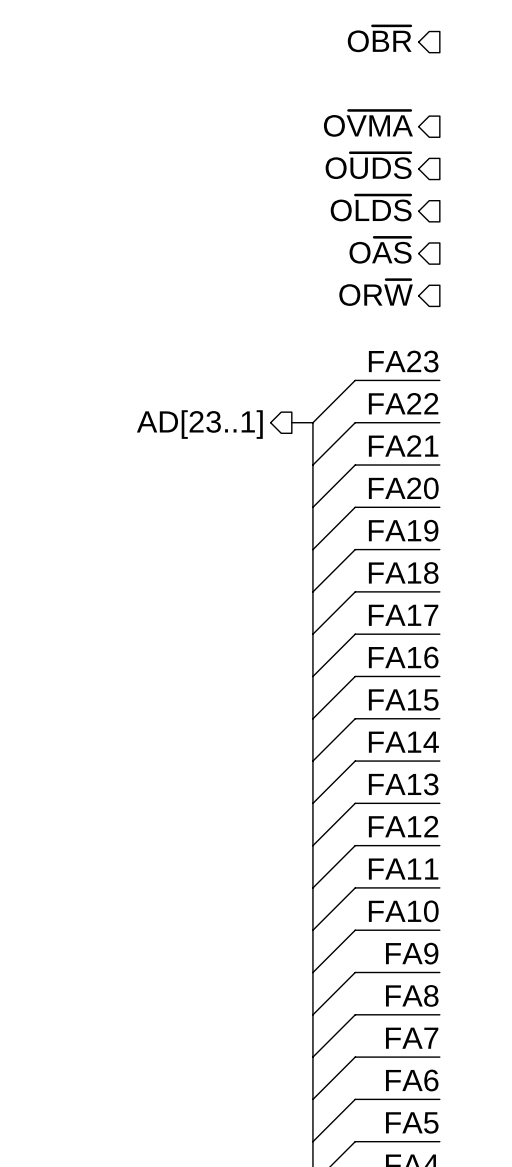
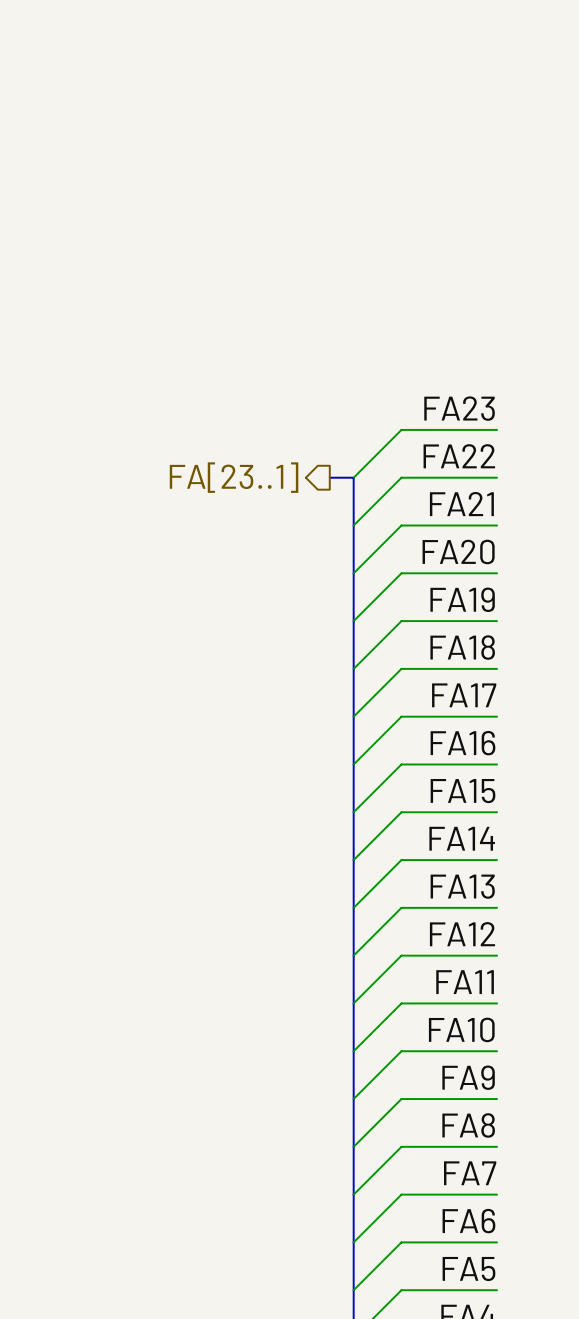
hierarchical label: O~{BR} (379, 39) -> none
hierarchical label: O~{VMA} (368, 123) -> none
hierarchical label: O~{UDS} (368, 165) -> none
hierarchical label: O~{LDS} (371, 208) -> none
hierarchical label: O~{AS} (380, 250) -> none
hierarchical label: OR~{W} (376, 292) -> none
hierarchical label: AD[23..1] (199, 424) -> FA[23..1] (234, 477)

